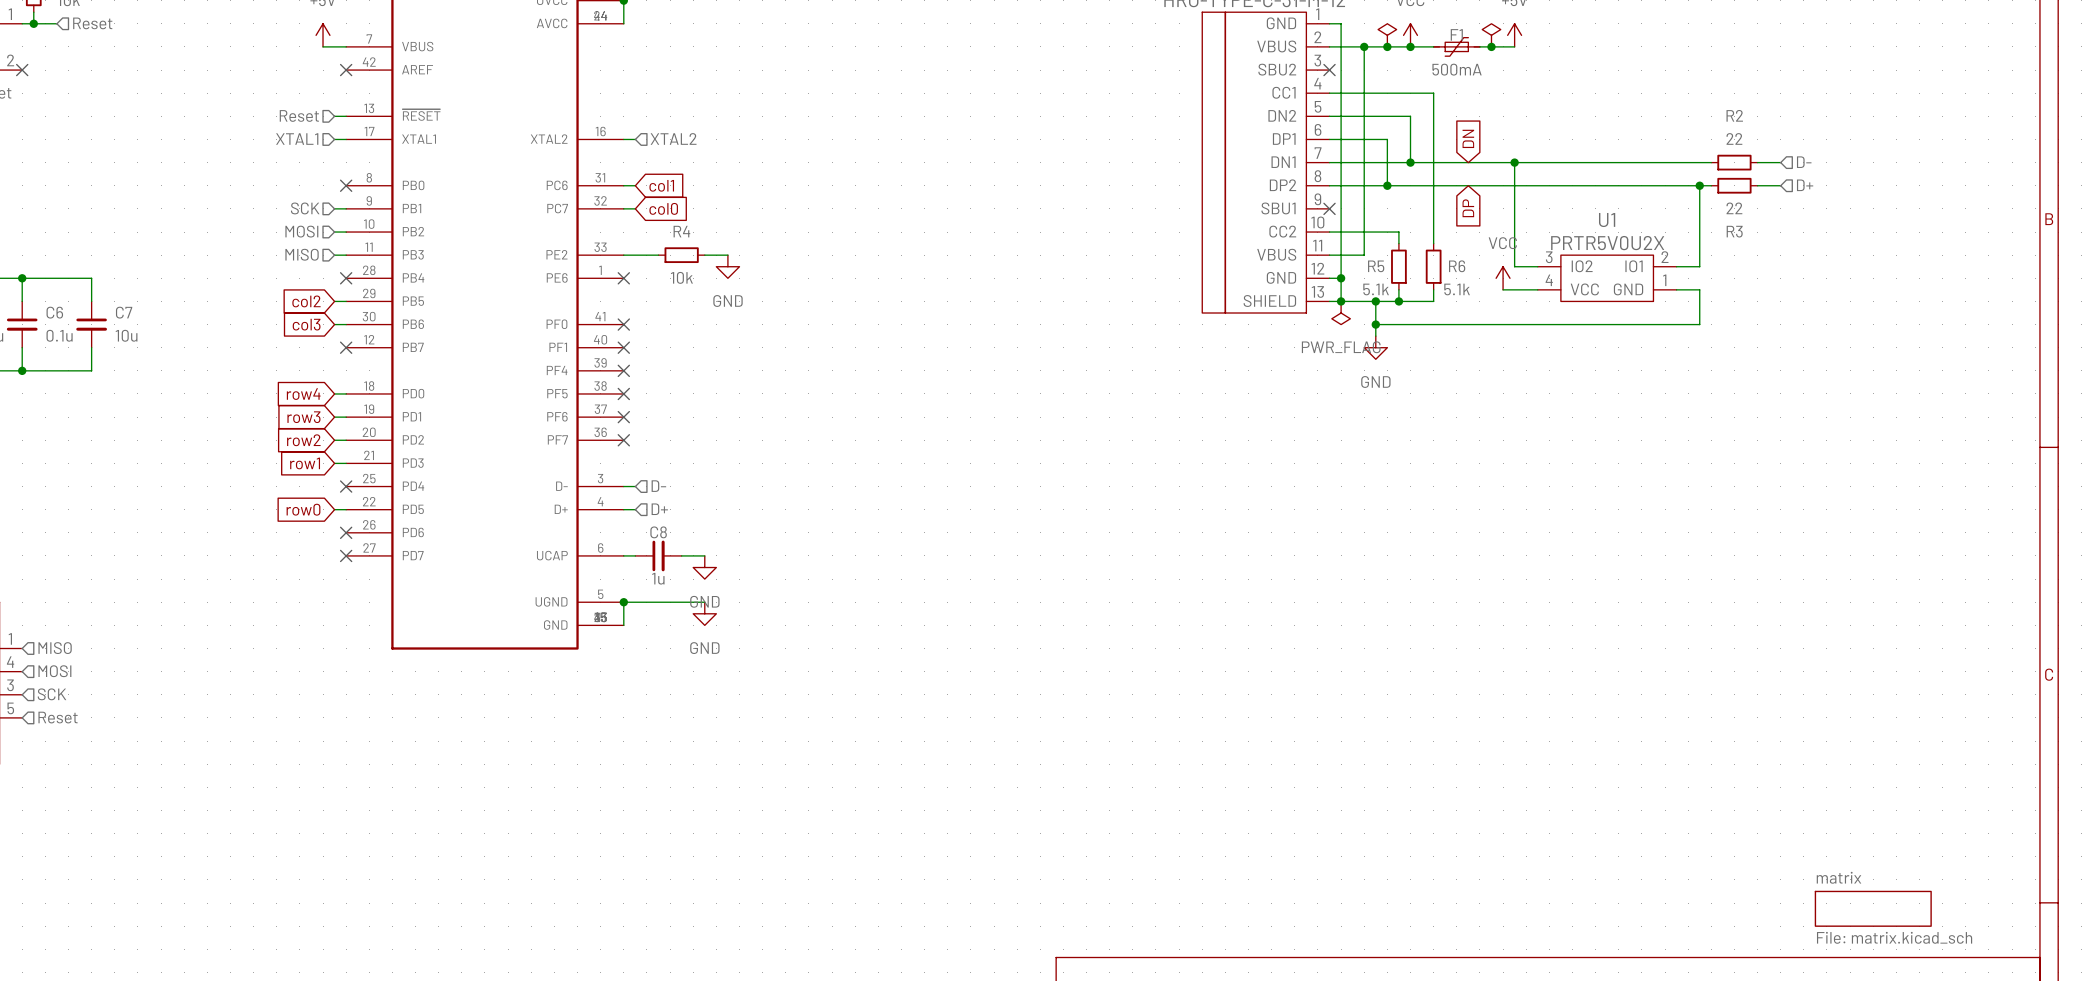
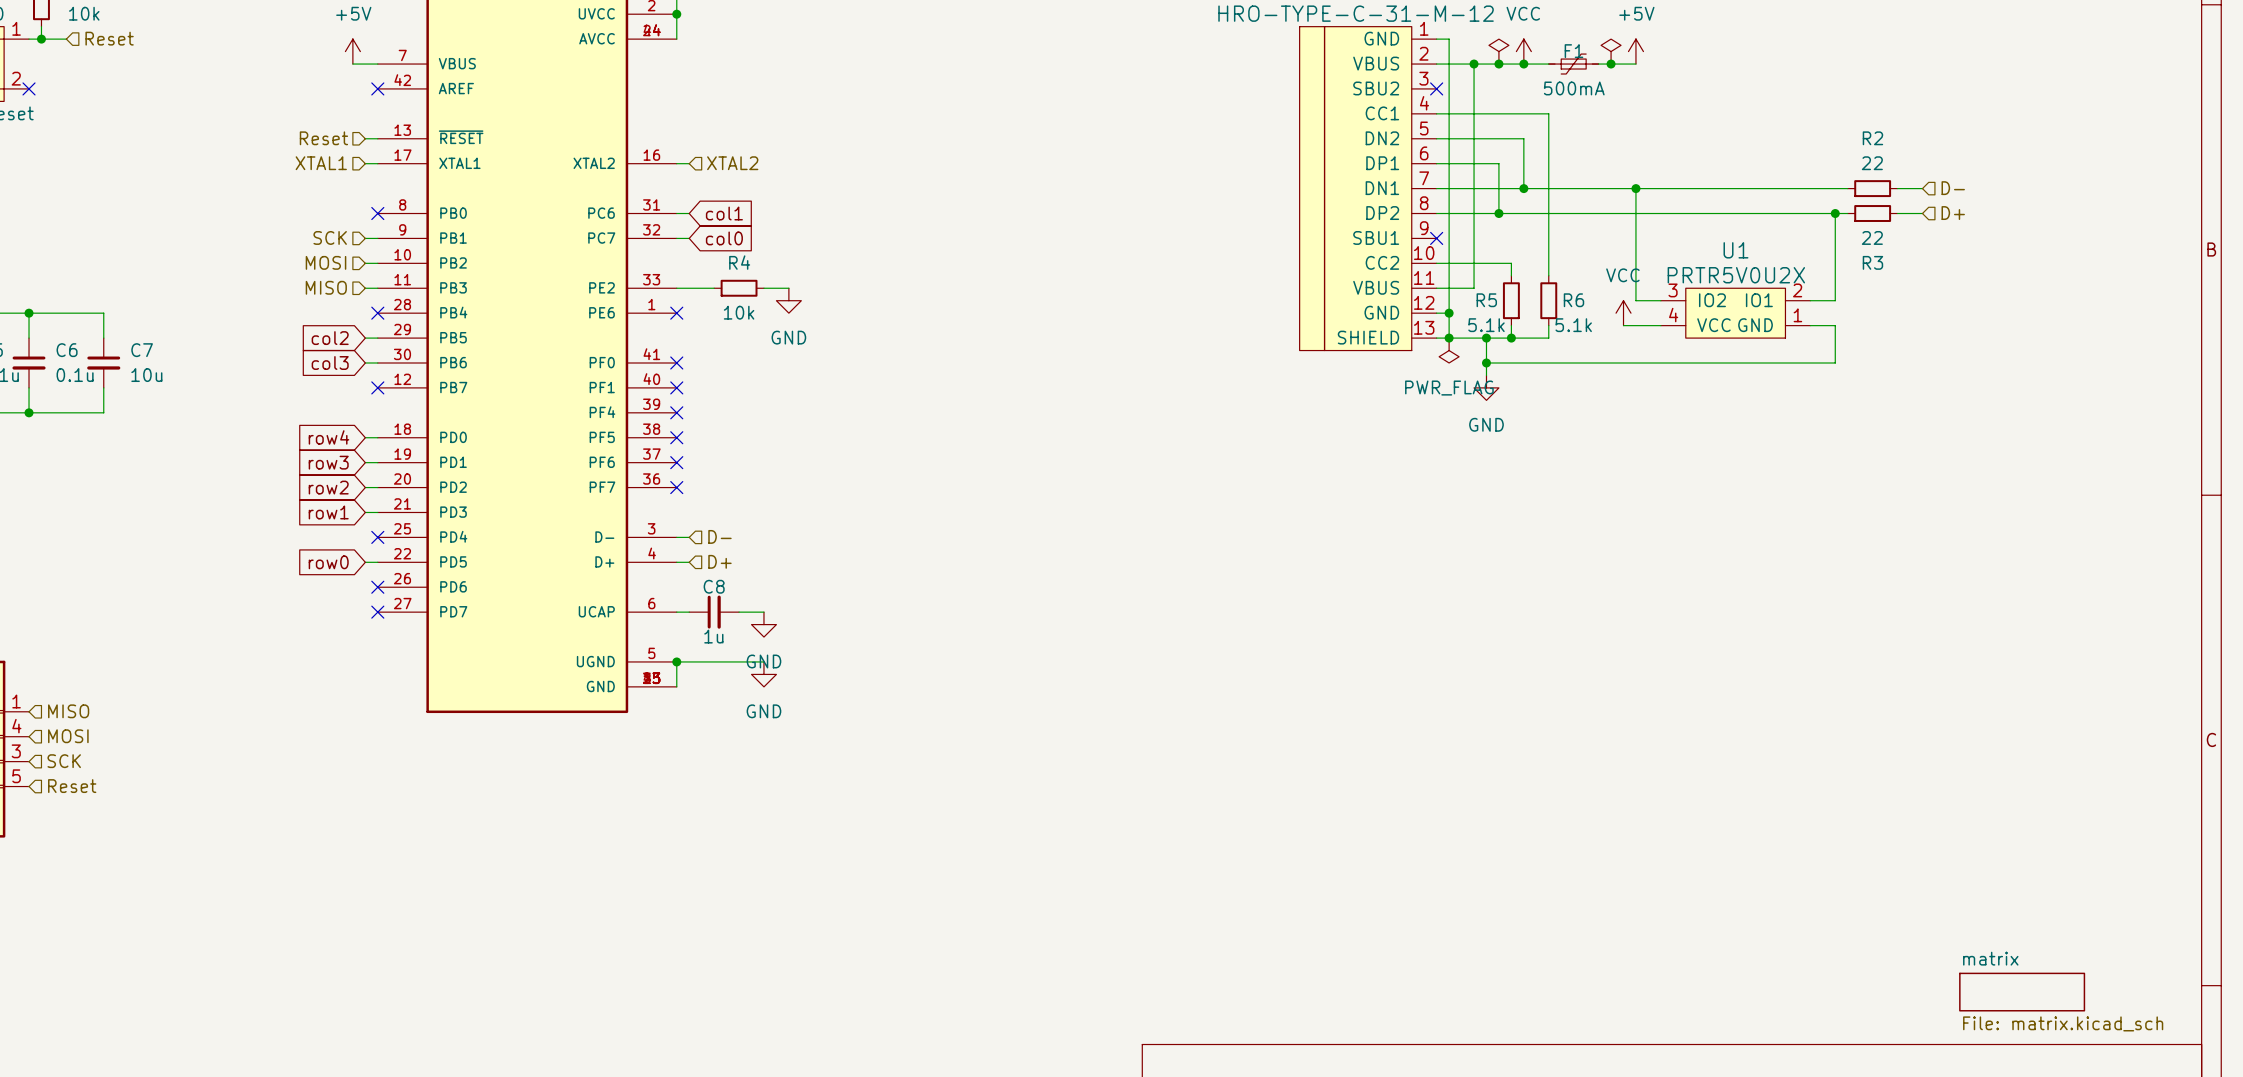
global label: DN (1468, 138) -> none
global label: DP (1468, 208) -> none

